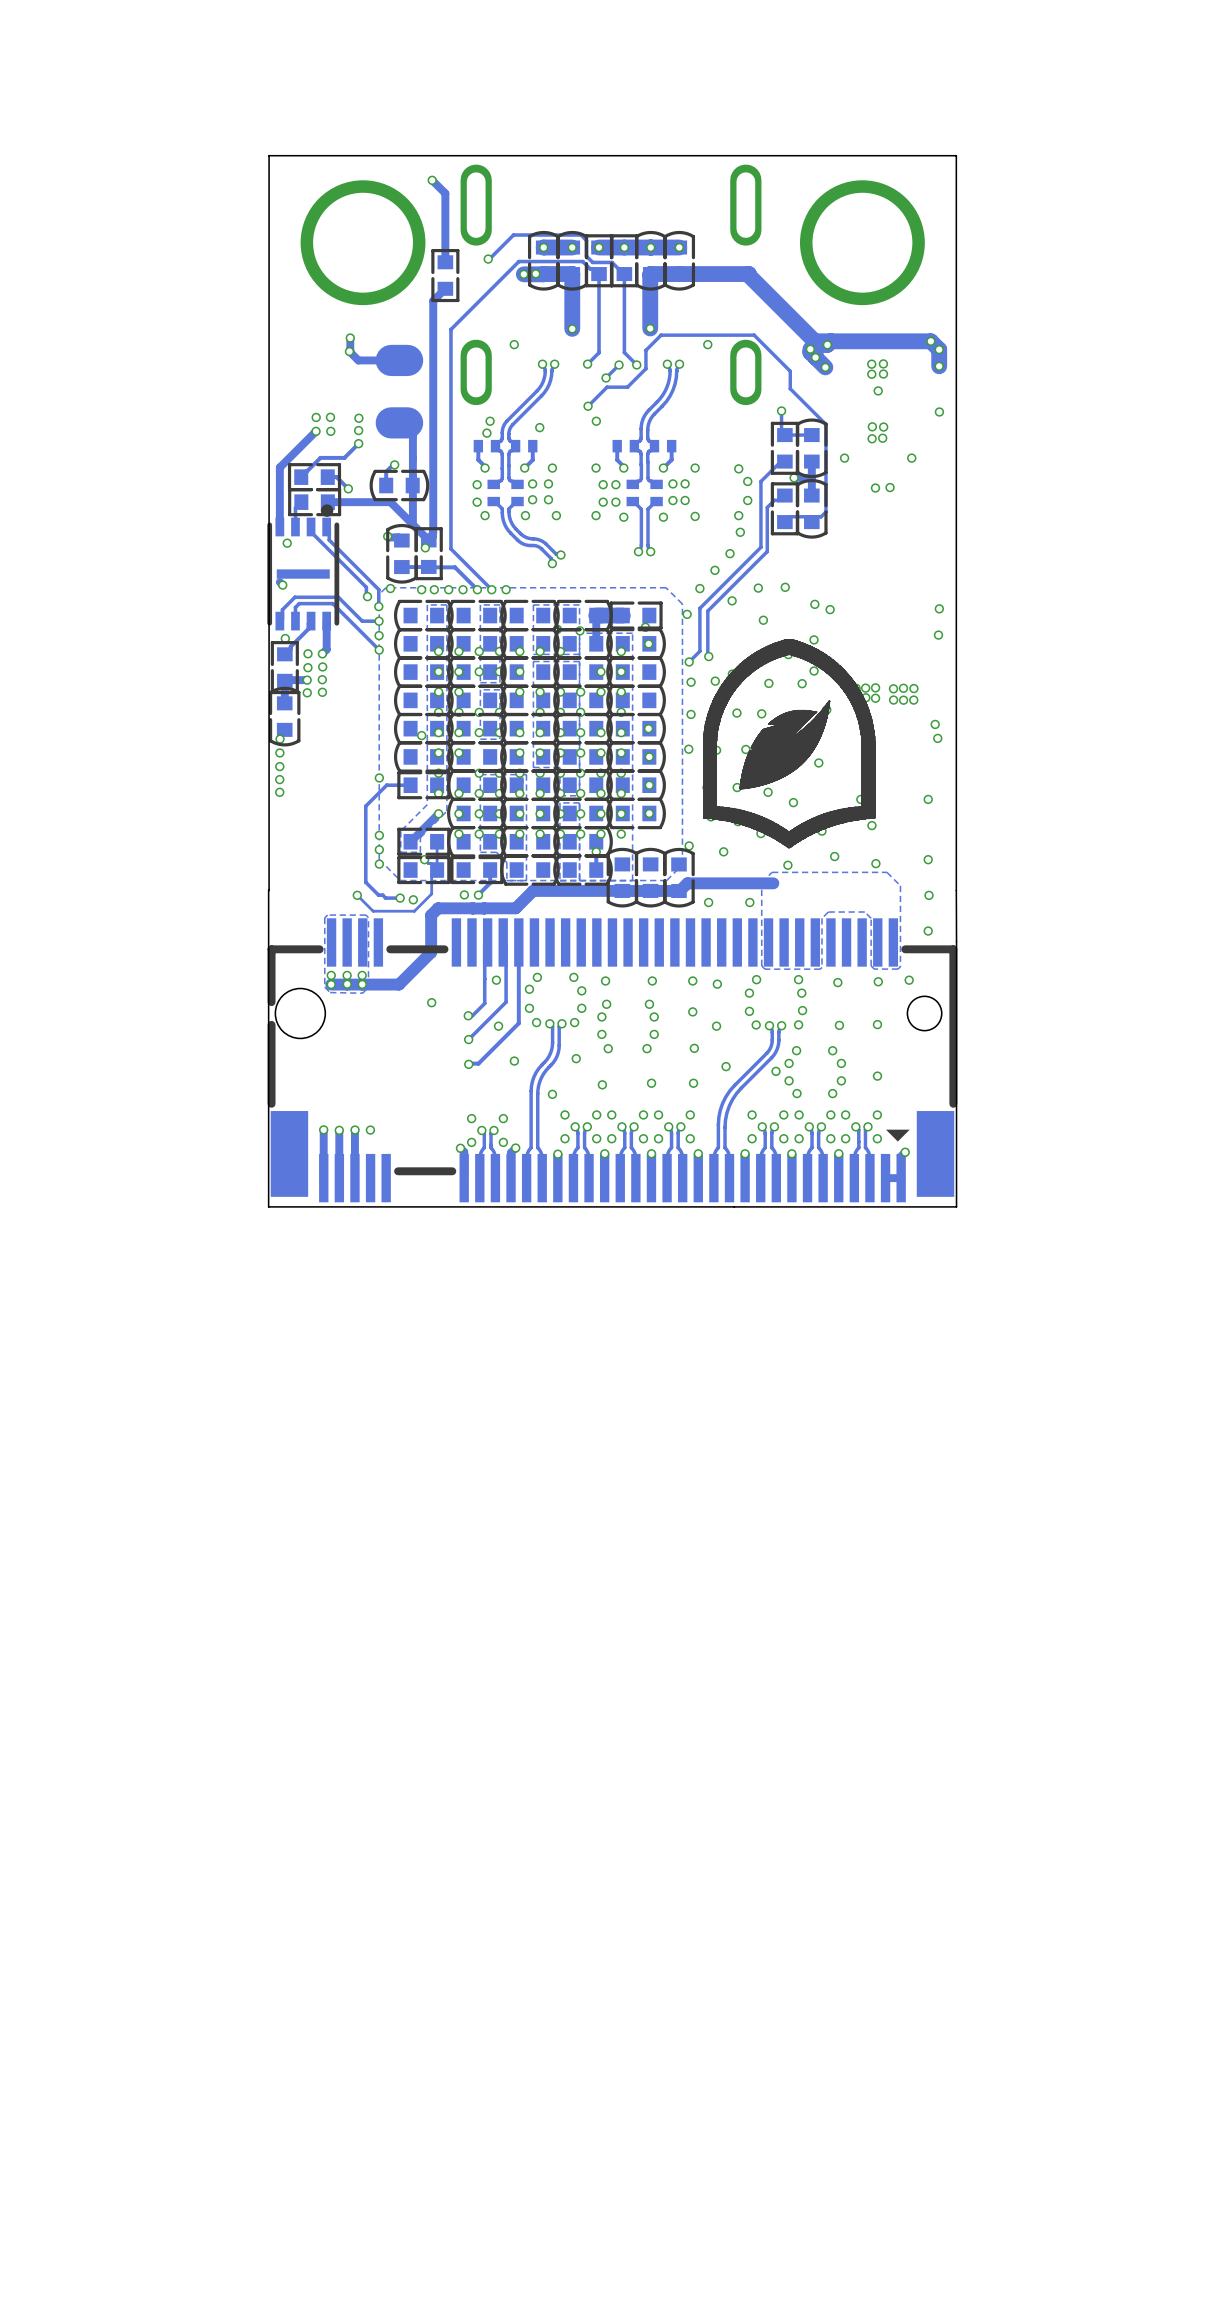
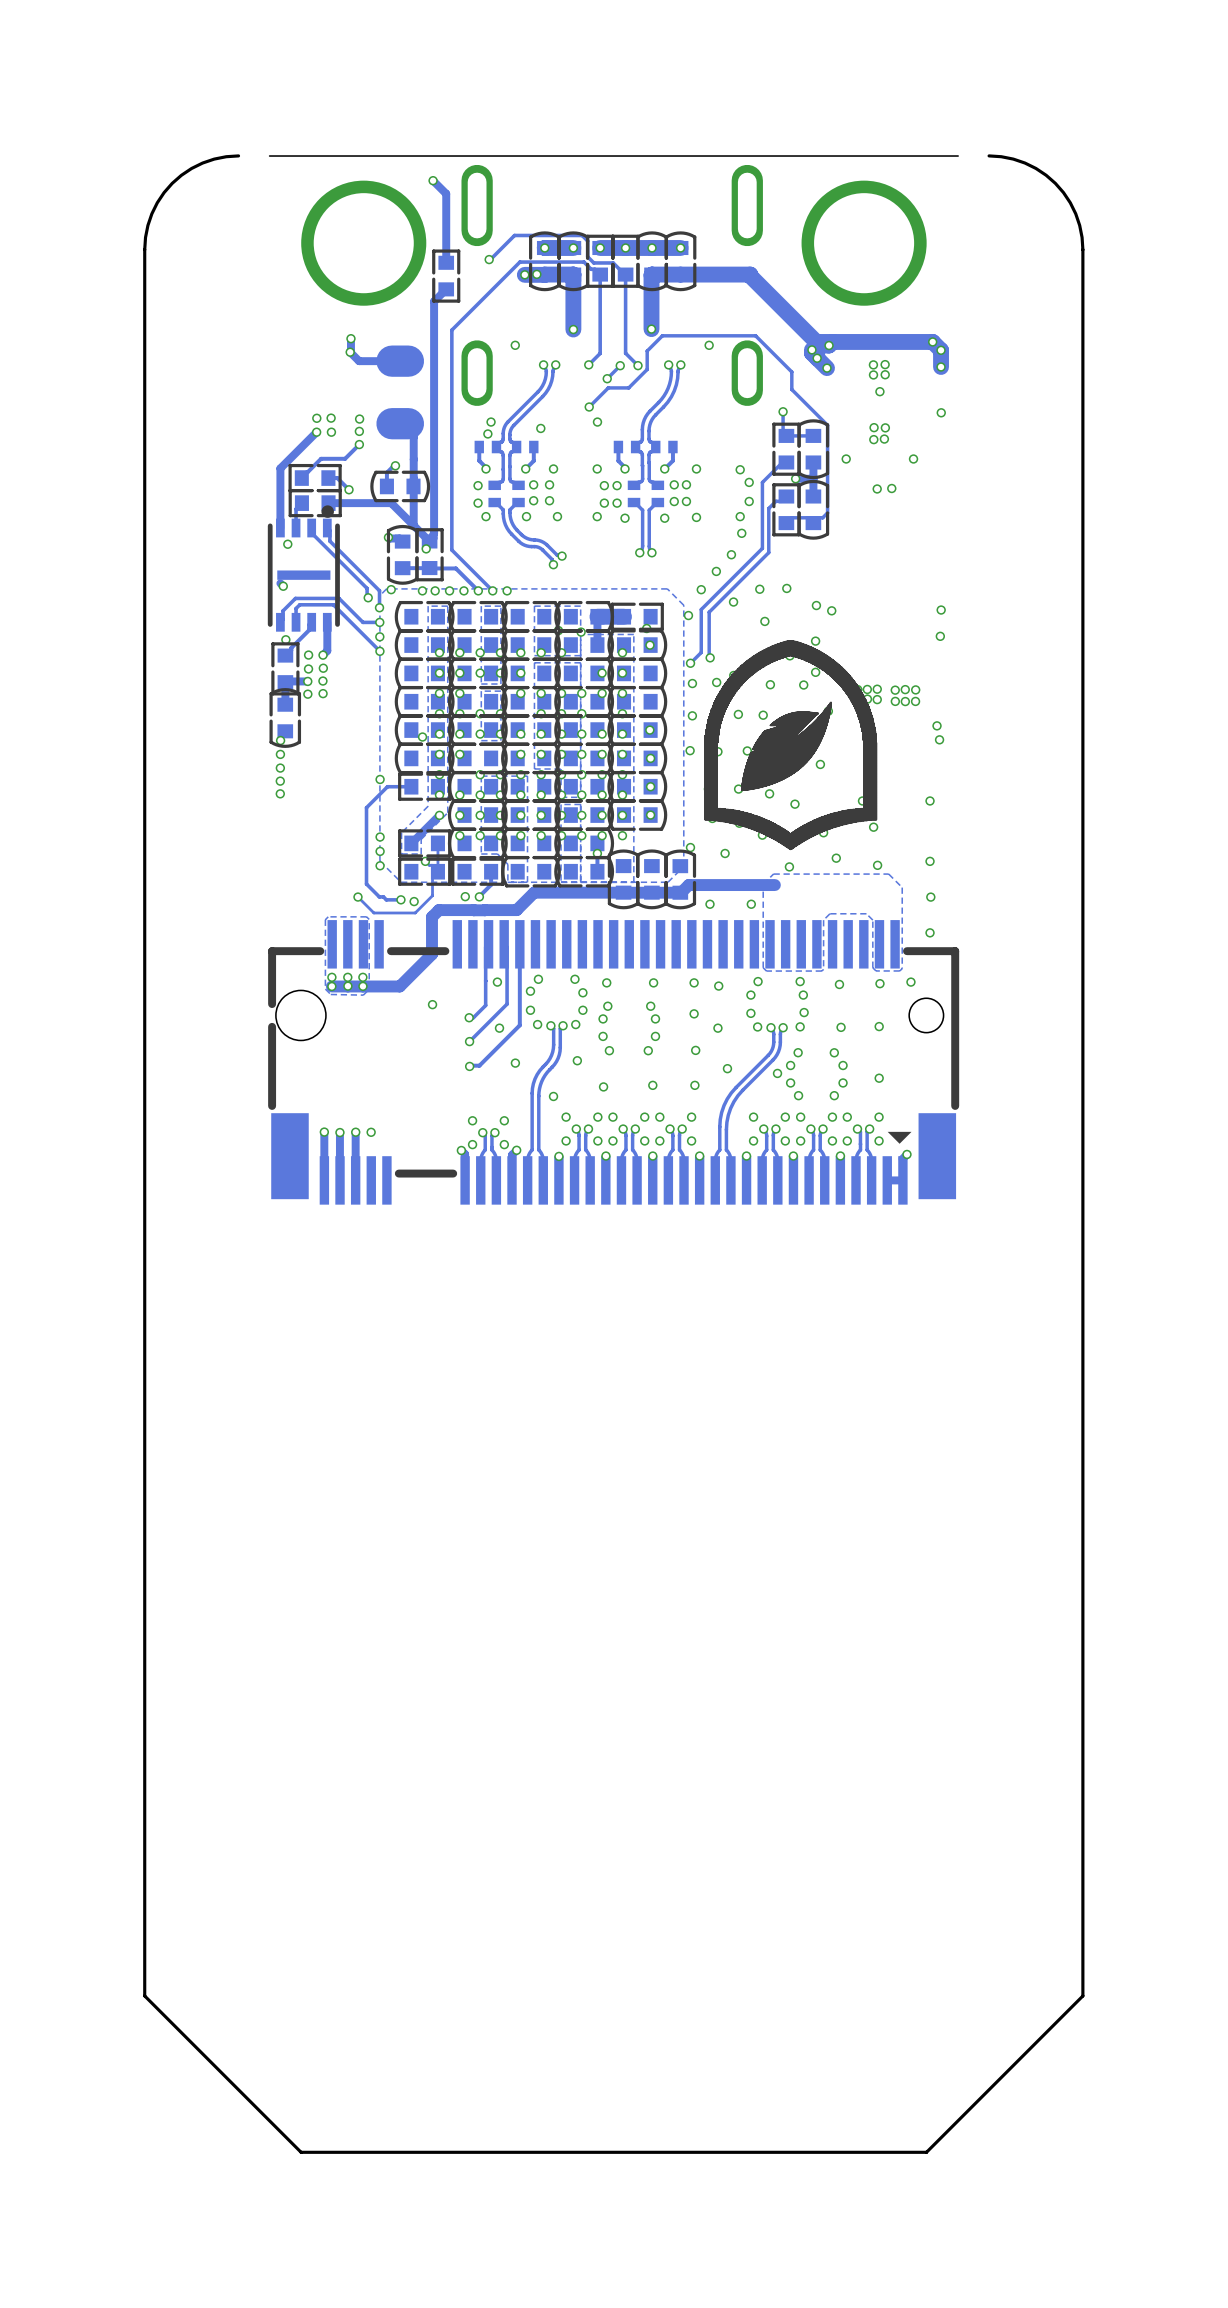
board edge: (269, 155) (269, 890) -> none
board edge: (956, 155) (956, 1206) (268, 1206) (268, 890) -> none
board edge: none -> (989, 155) (1001, 156) (1024, 163) (1035, 168) (1055, 183) (1070, 202) (1075, 213) (1082, 237) (1082, 249) (1082, 1995) (926, 2152) (301, 2152) (144, 1995) (144, 249) (147, 225) (151, 213) (157, 202) (172, 183) (181, 175) (202, 163) (226, 156) (238, 155)

